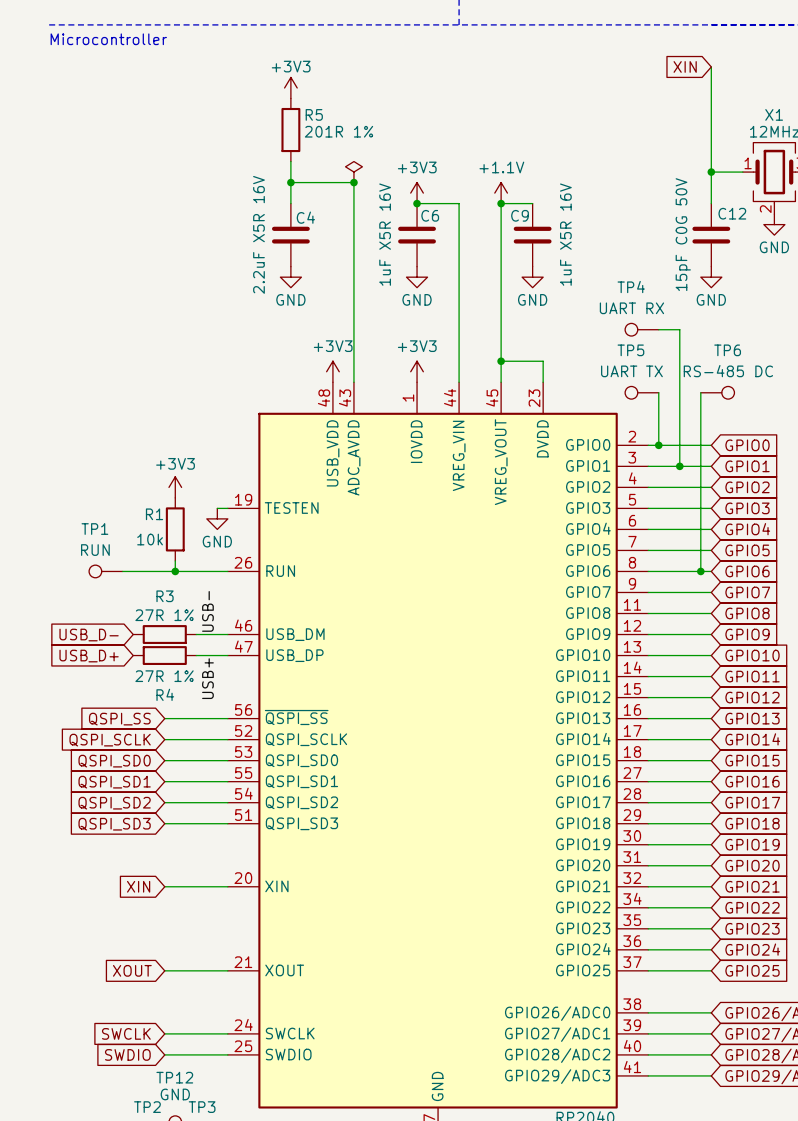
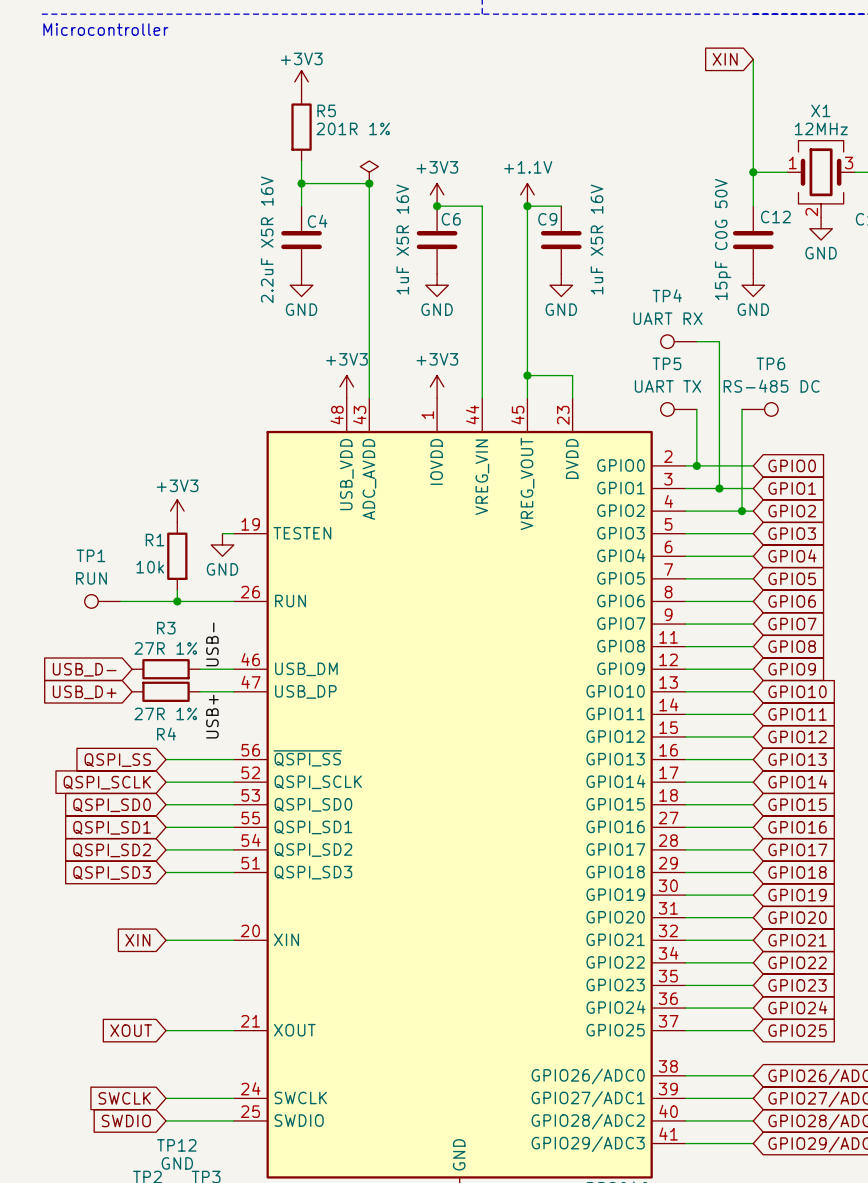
wire: (700, 487) (700, 571) -> none
junction: none -> (742, 511)
junction: (700, 571) -> none

